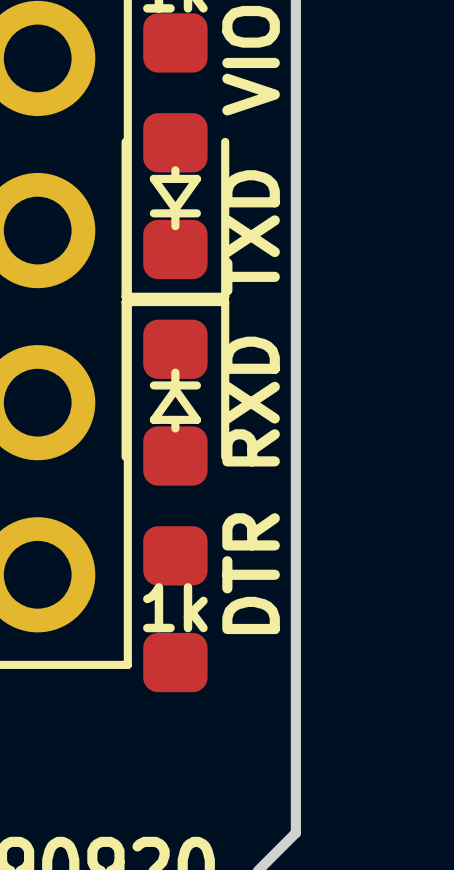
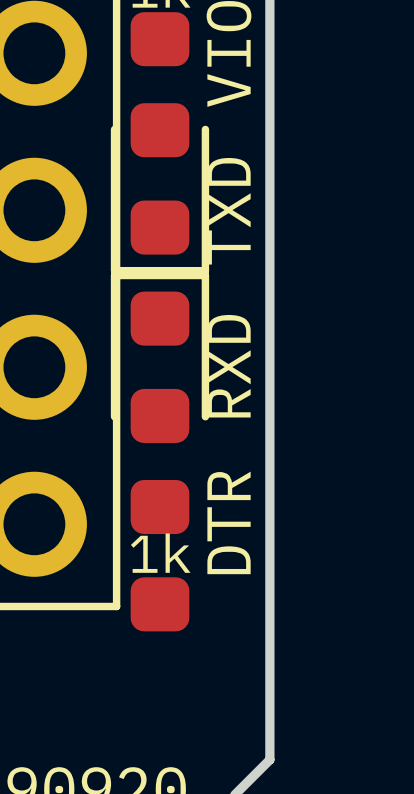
part footprint: [121, 113, 230, 301] -> [110, 103, 210, 275]
part footprint: [121, 297, 230, 486] -> [110, 271, 210, 444]

